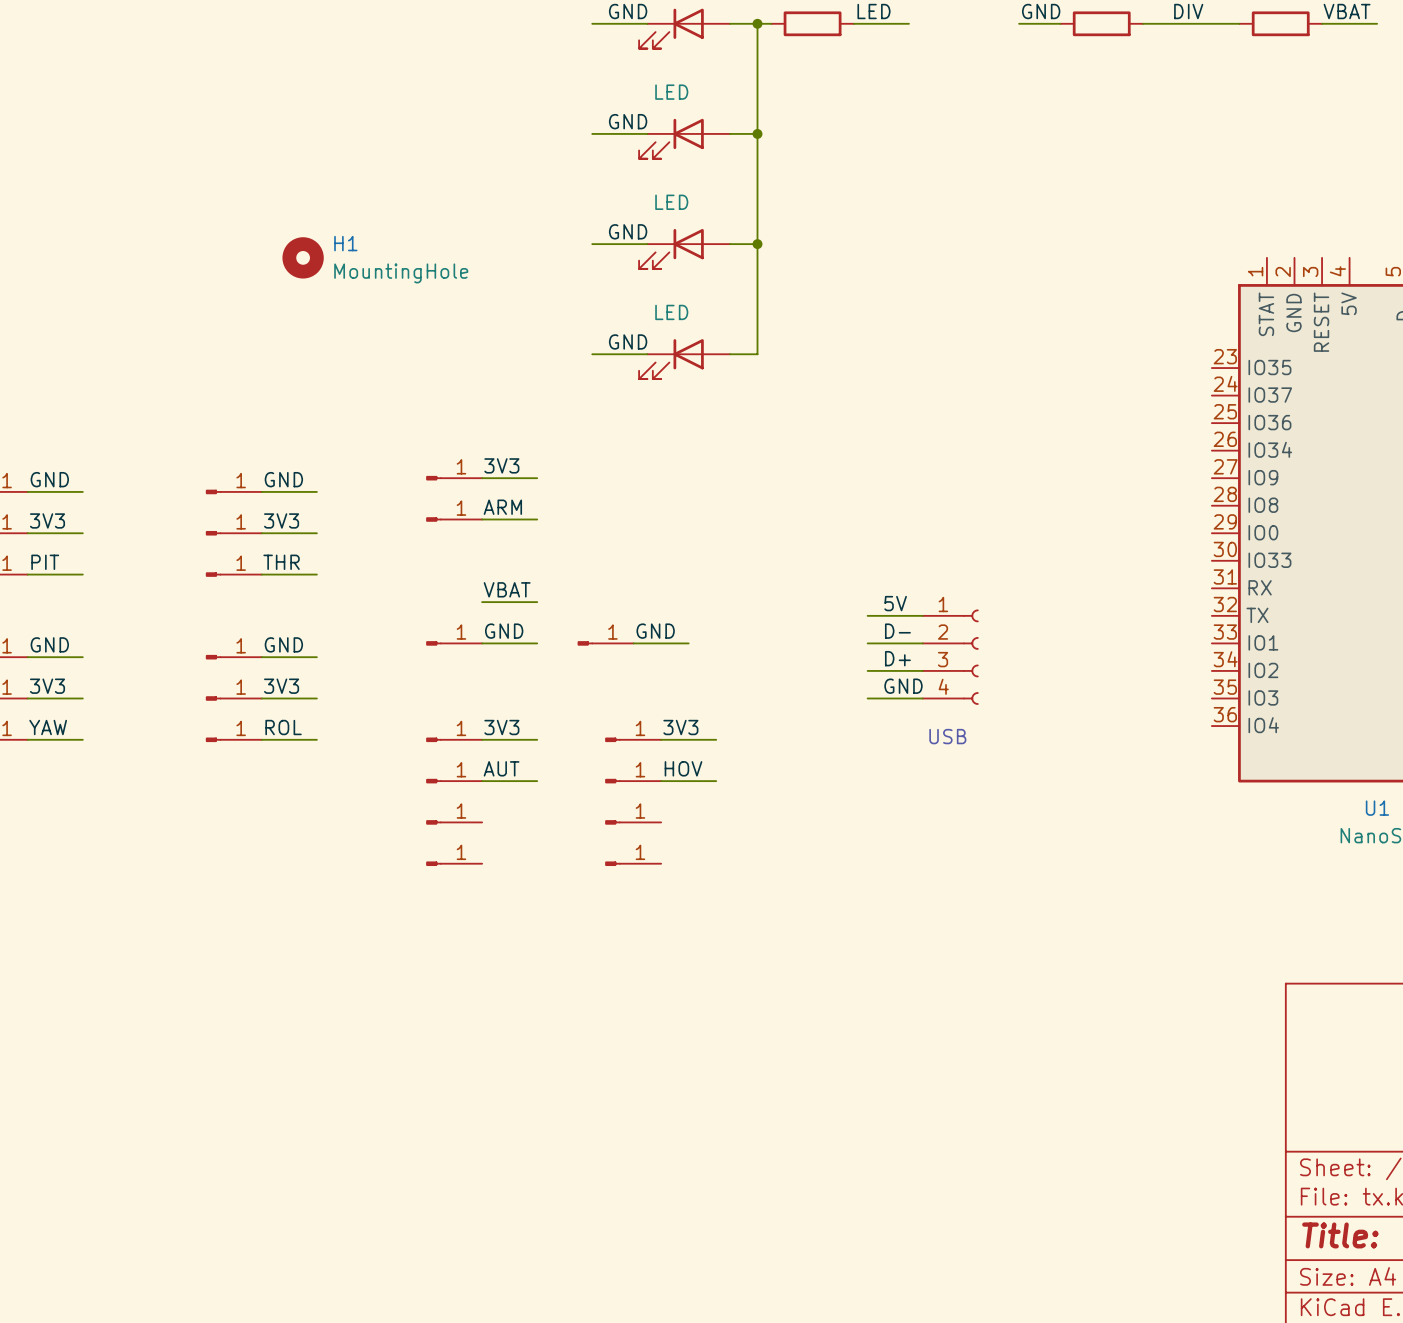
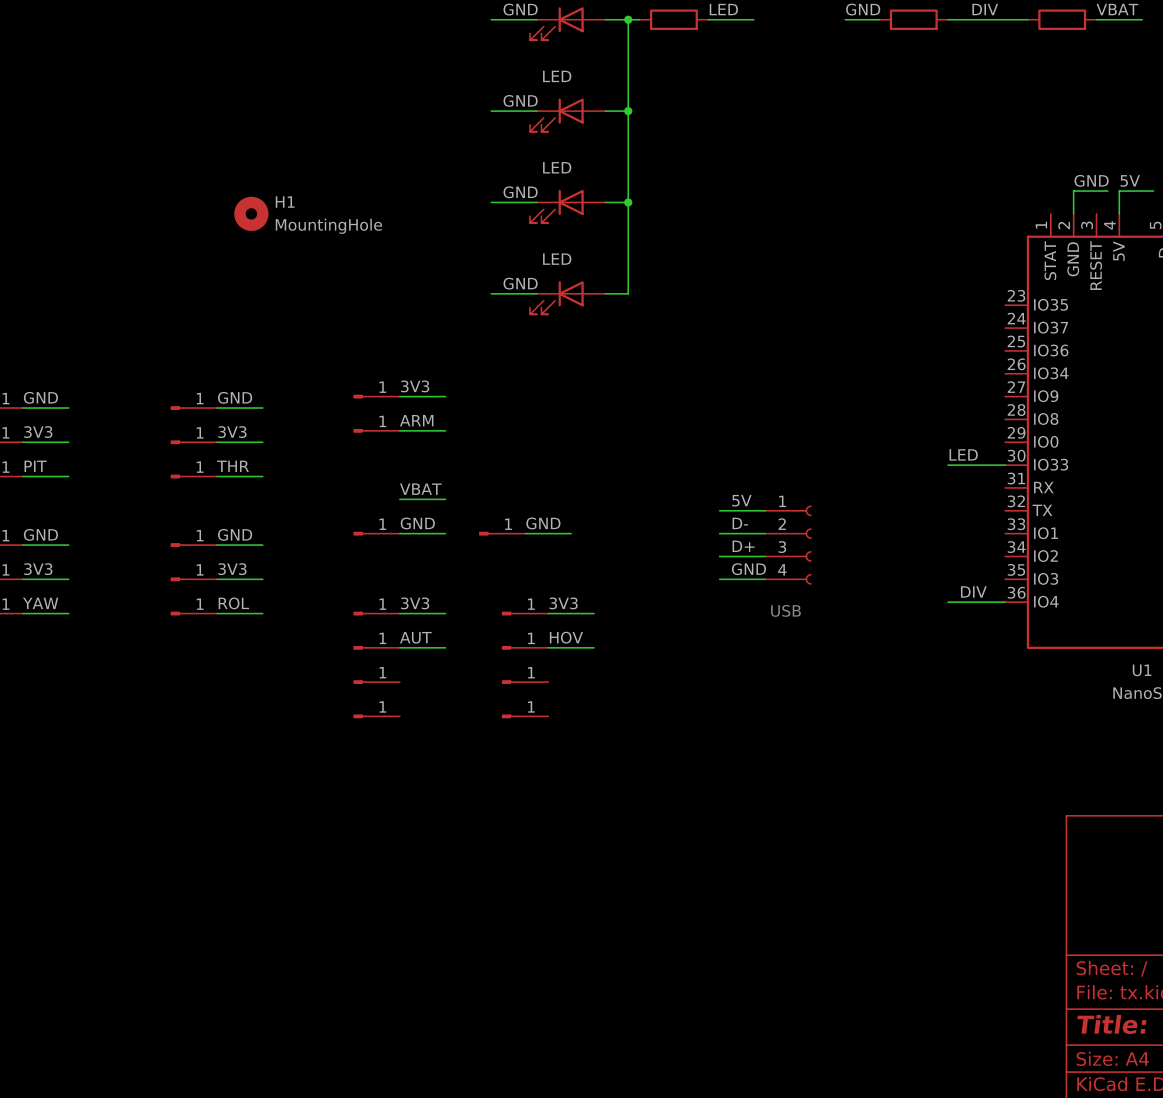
label: none -> GND (1091, 180)
label: none -> 5V (1130, 180)
wire: none -> (1107, 191) (1073, 191) (1073, 213)
wire: none -> (1153, 191) (1119, 191) (1119, 213)
label: none -> LED (963, 454)
wire: none -> (948, 465) (1005, 465)
label: none -> DIV (973, 591)
wire: none -> (948, 602) (1005, 602)

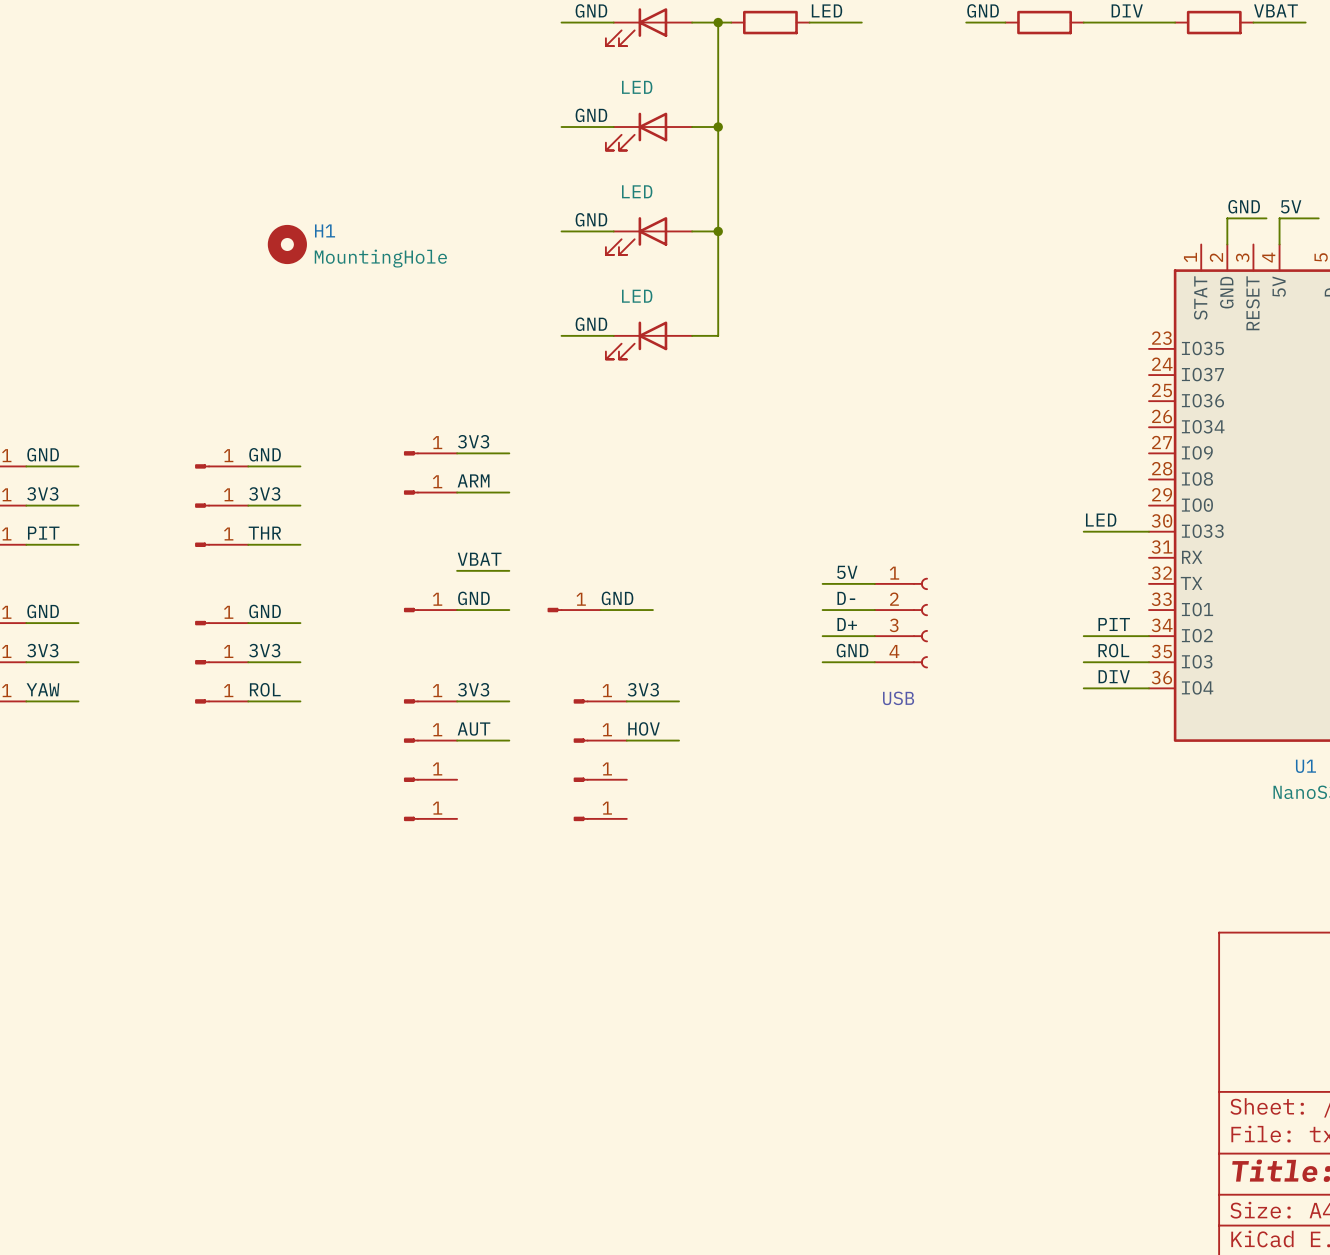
label: none -> PIT (1114, 624)
wire: none -> (1083, 636) (1149, 636)
label: none -> ROL (1113, 650)
wire: none -> (1083, 662) (1149, 662)

